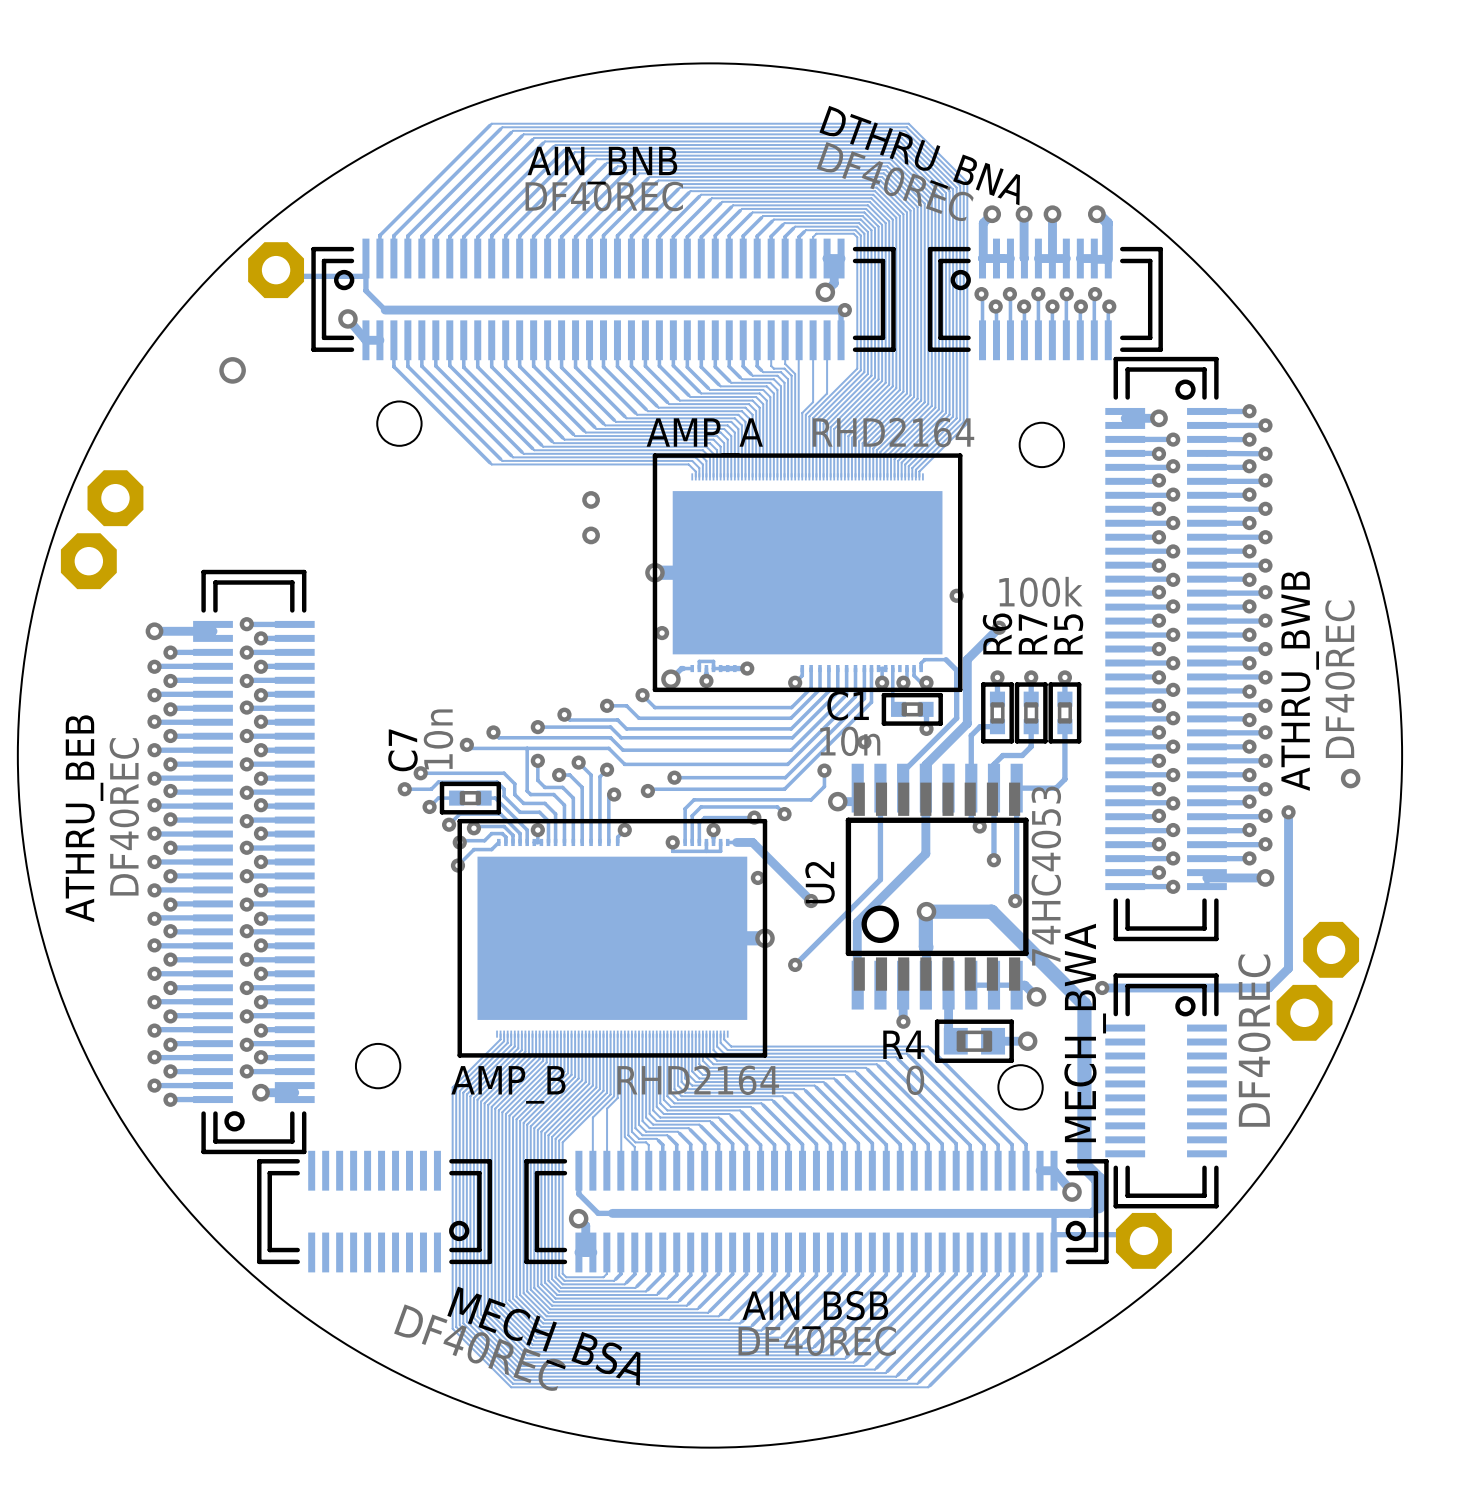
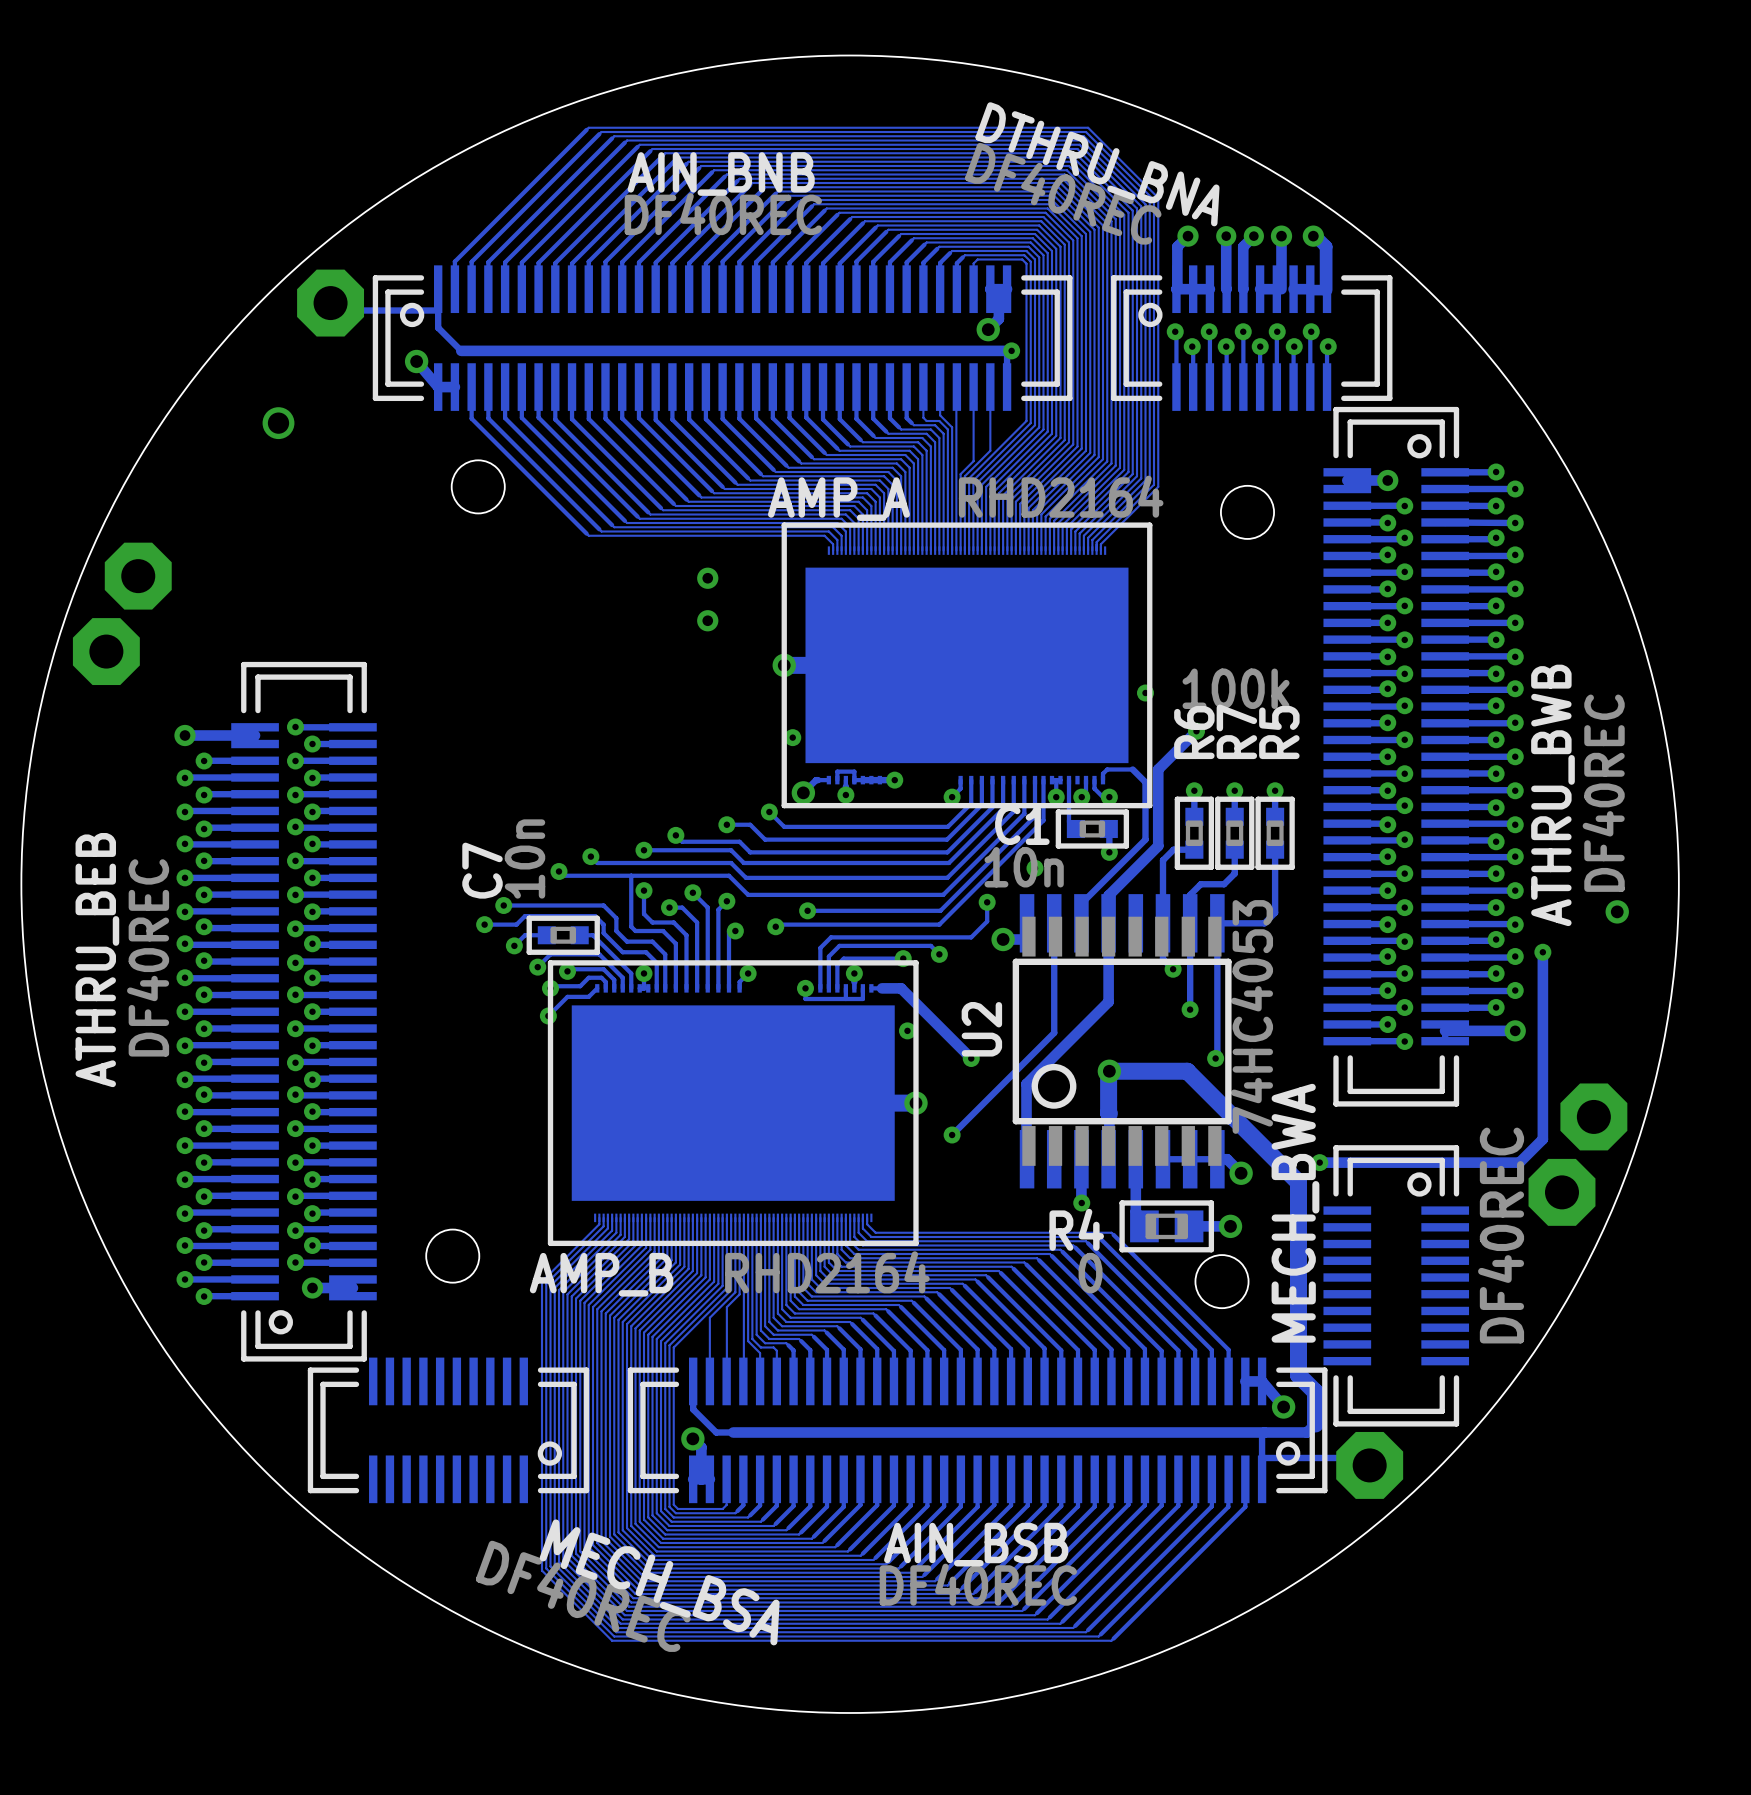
via: none -> (1253, 236)
track: (1052, 214) (1052, 258) (1038, 258) -> (1253, 236) (1243, 246) (1243, 289)
via position: (1052, 214) -> (1281, 236)
track: none -> (1281, 236) (1281, 289)

